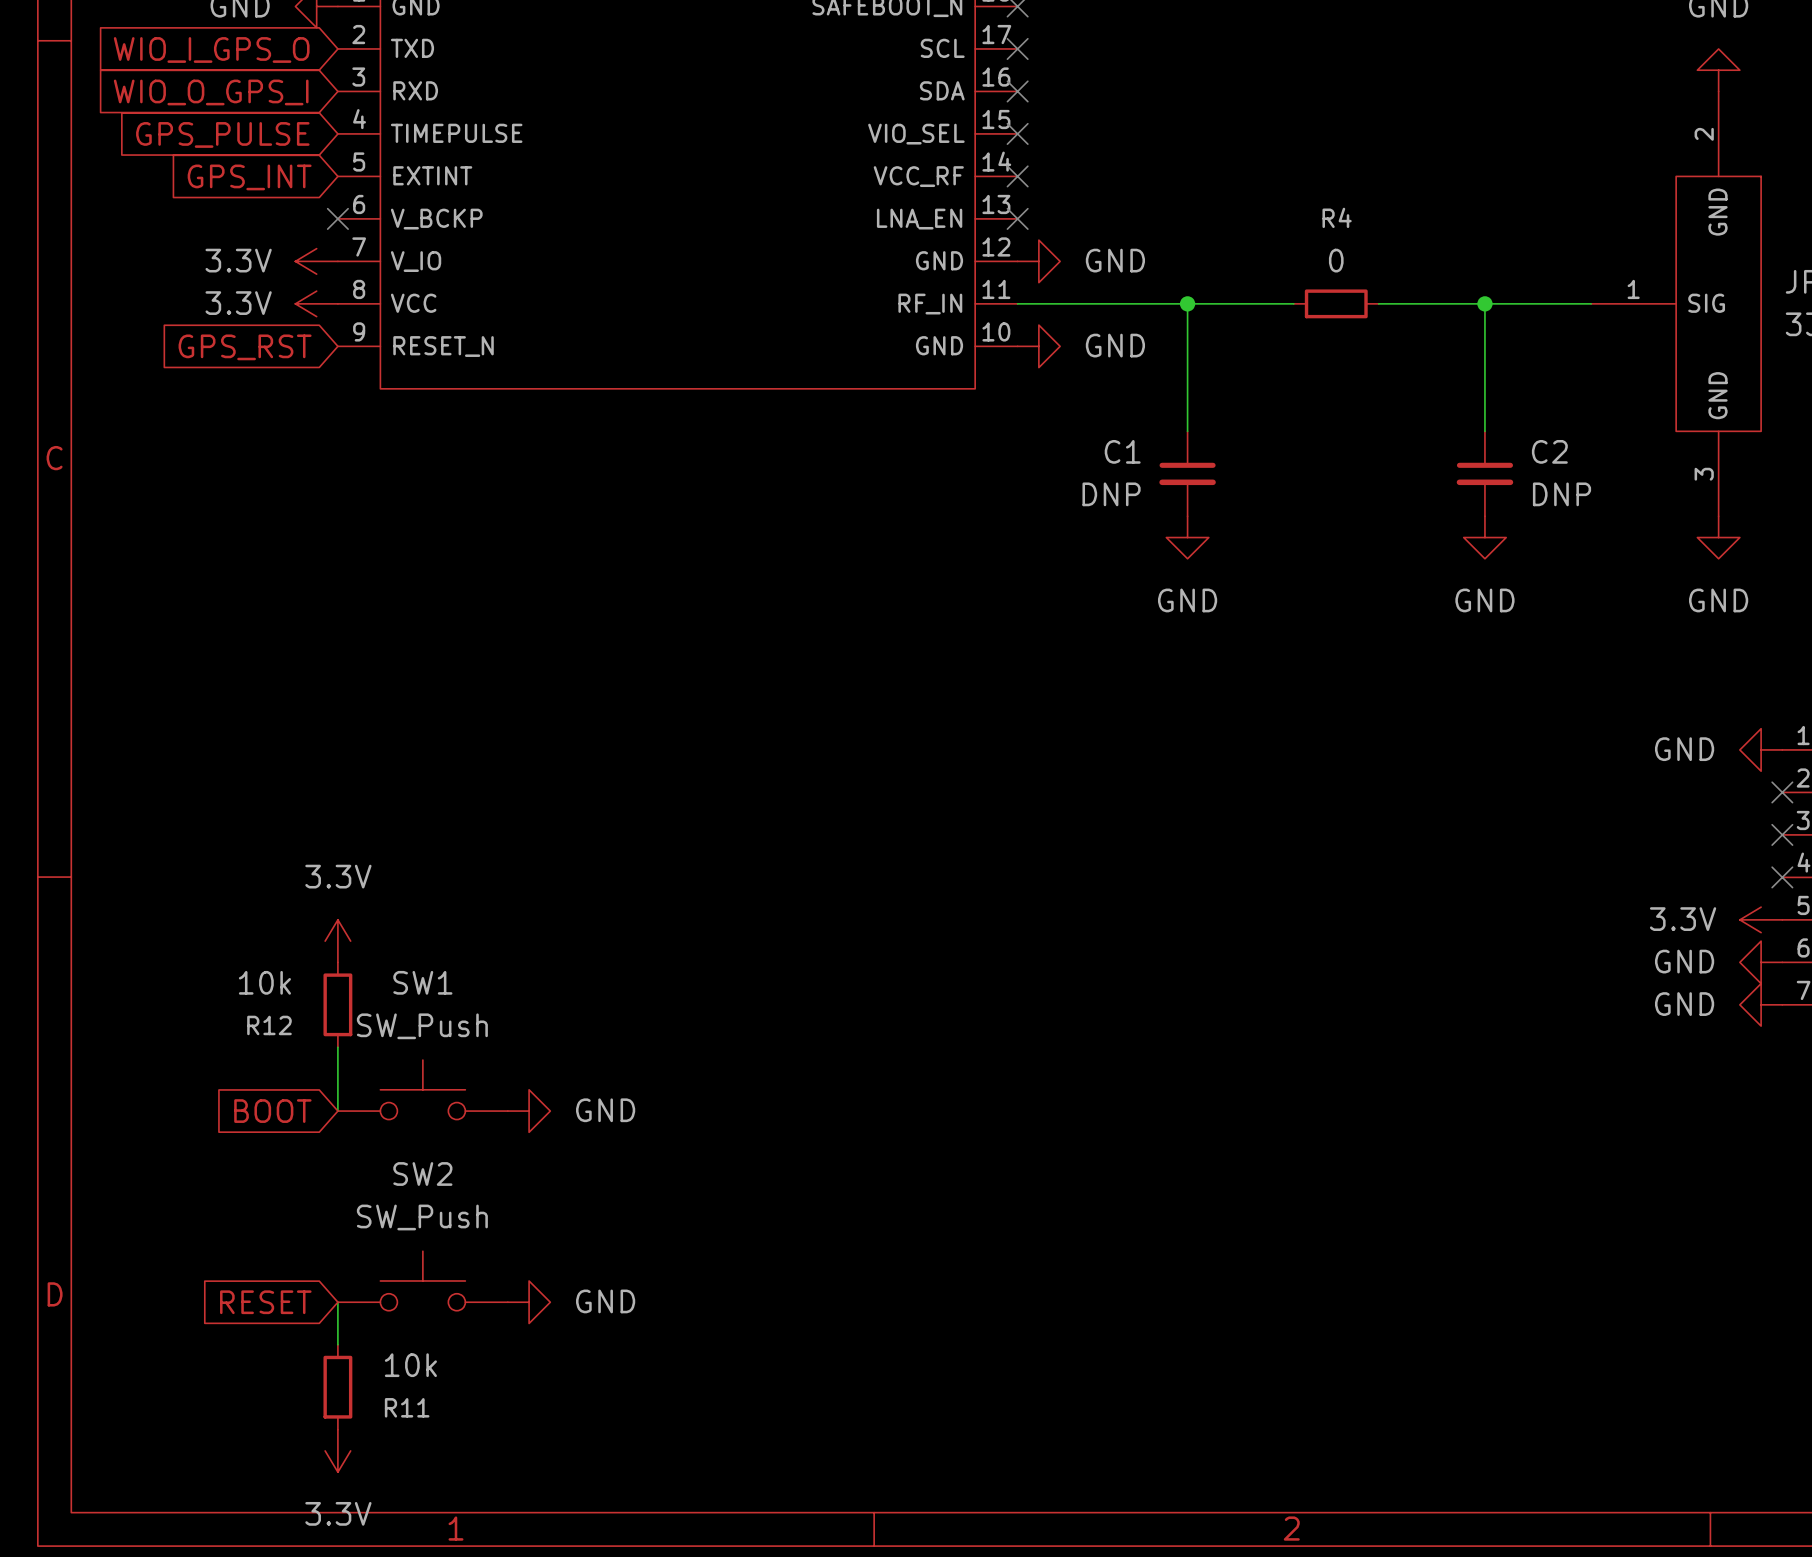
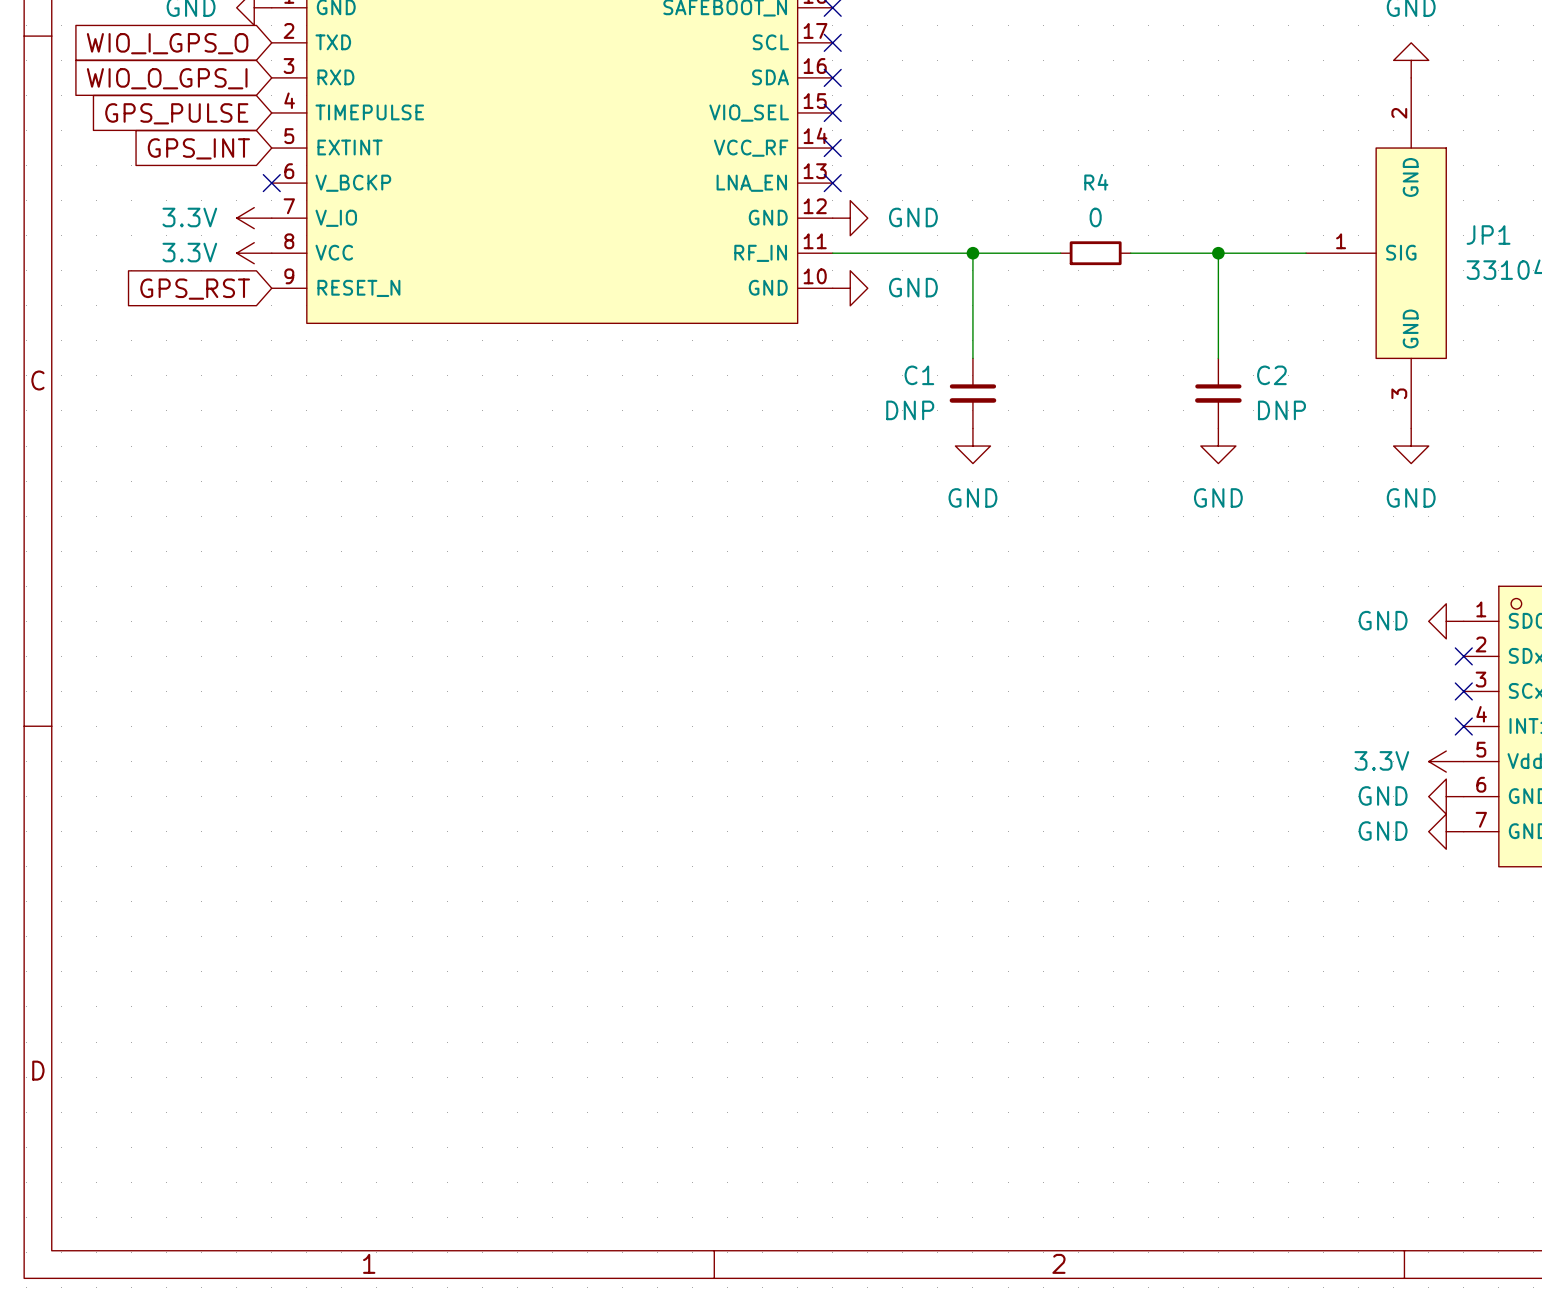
power symbol: 3.3V (337, 941) -> none
R12: 10k (337, 1004) -> none
wire: (337, 1047) (337, 1111) -> none
SW1: SW_Push (422, 1089) -> none
global label: BOOT (272, 1111) -> none
power symbol: GND (529, 1111) -> none
SW2: SW_Push (422, 1280) -> none
global label: RESET (265, 1302) -> none
wire: (337, 1302) (337, 1344) -> none
power symbol: GND (529, 1302) -> none
R11: 10k (337, 1387) -> none
power symbol: 3.3V (337, 1450) -> none

